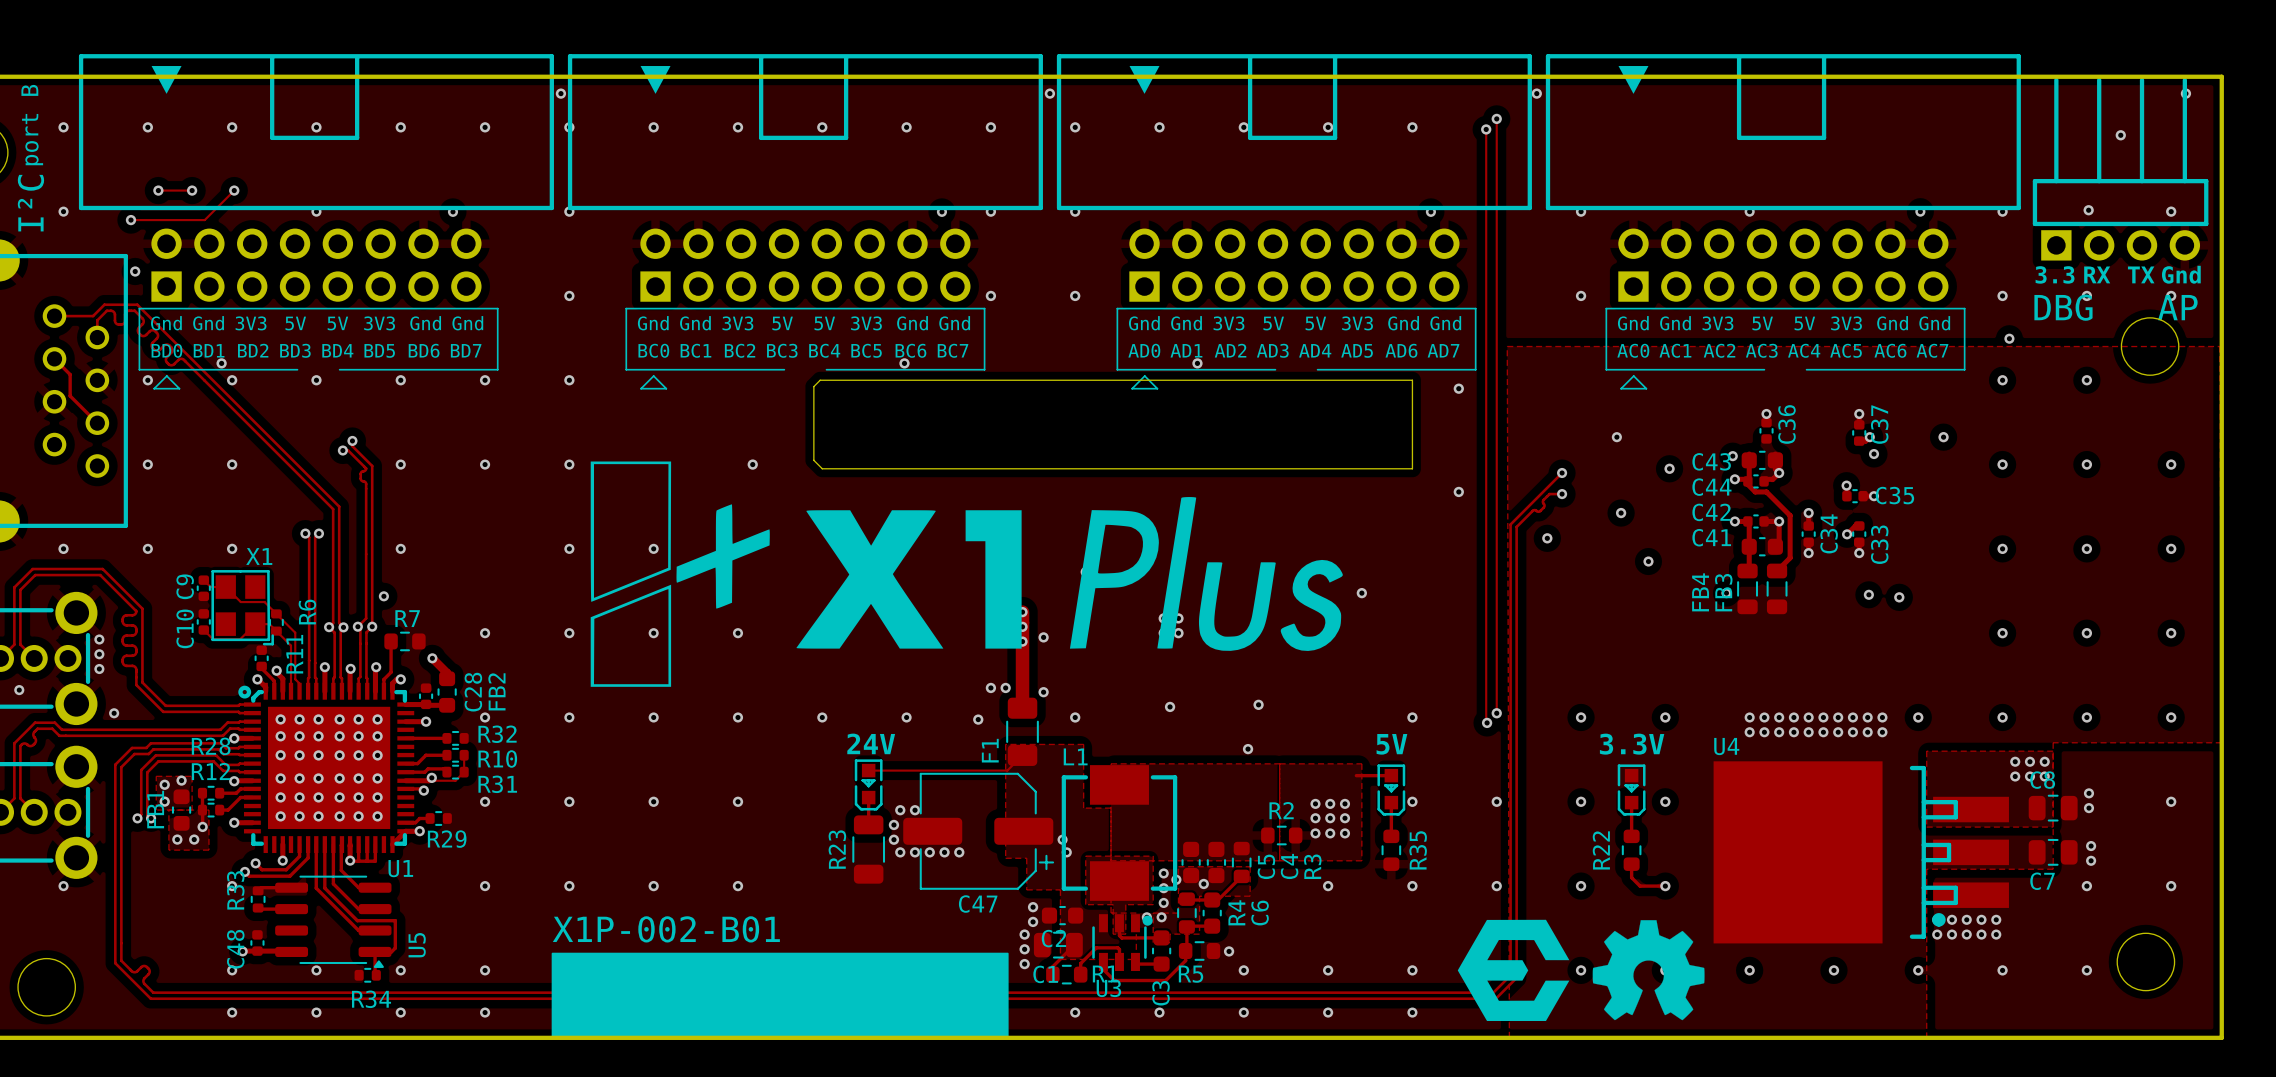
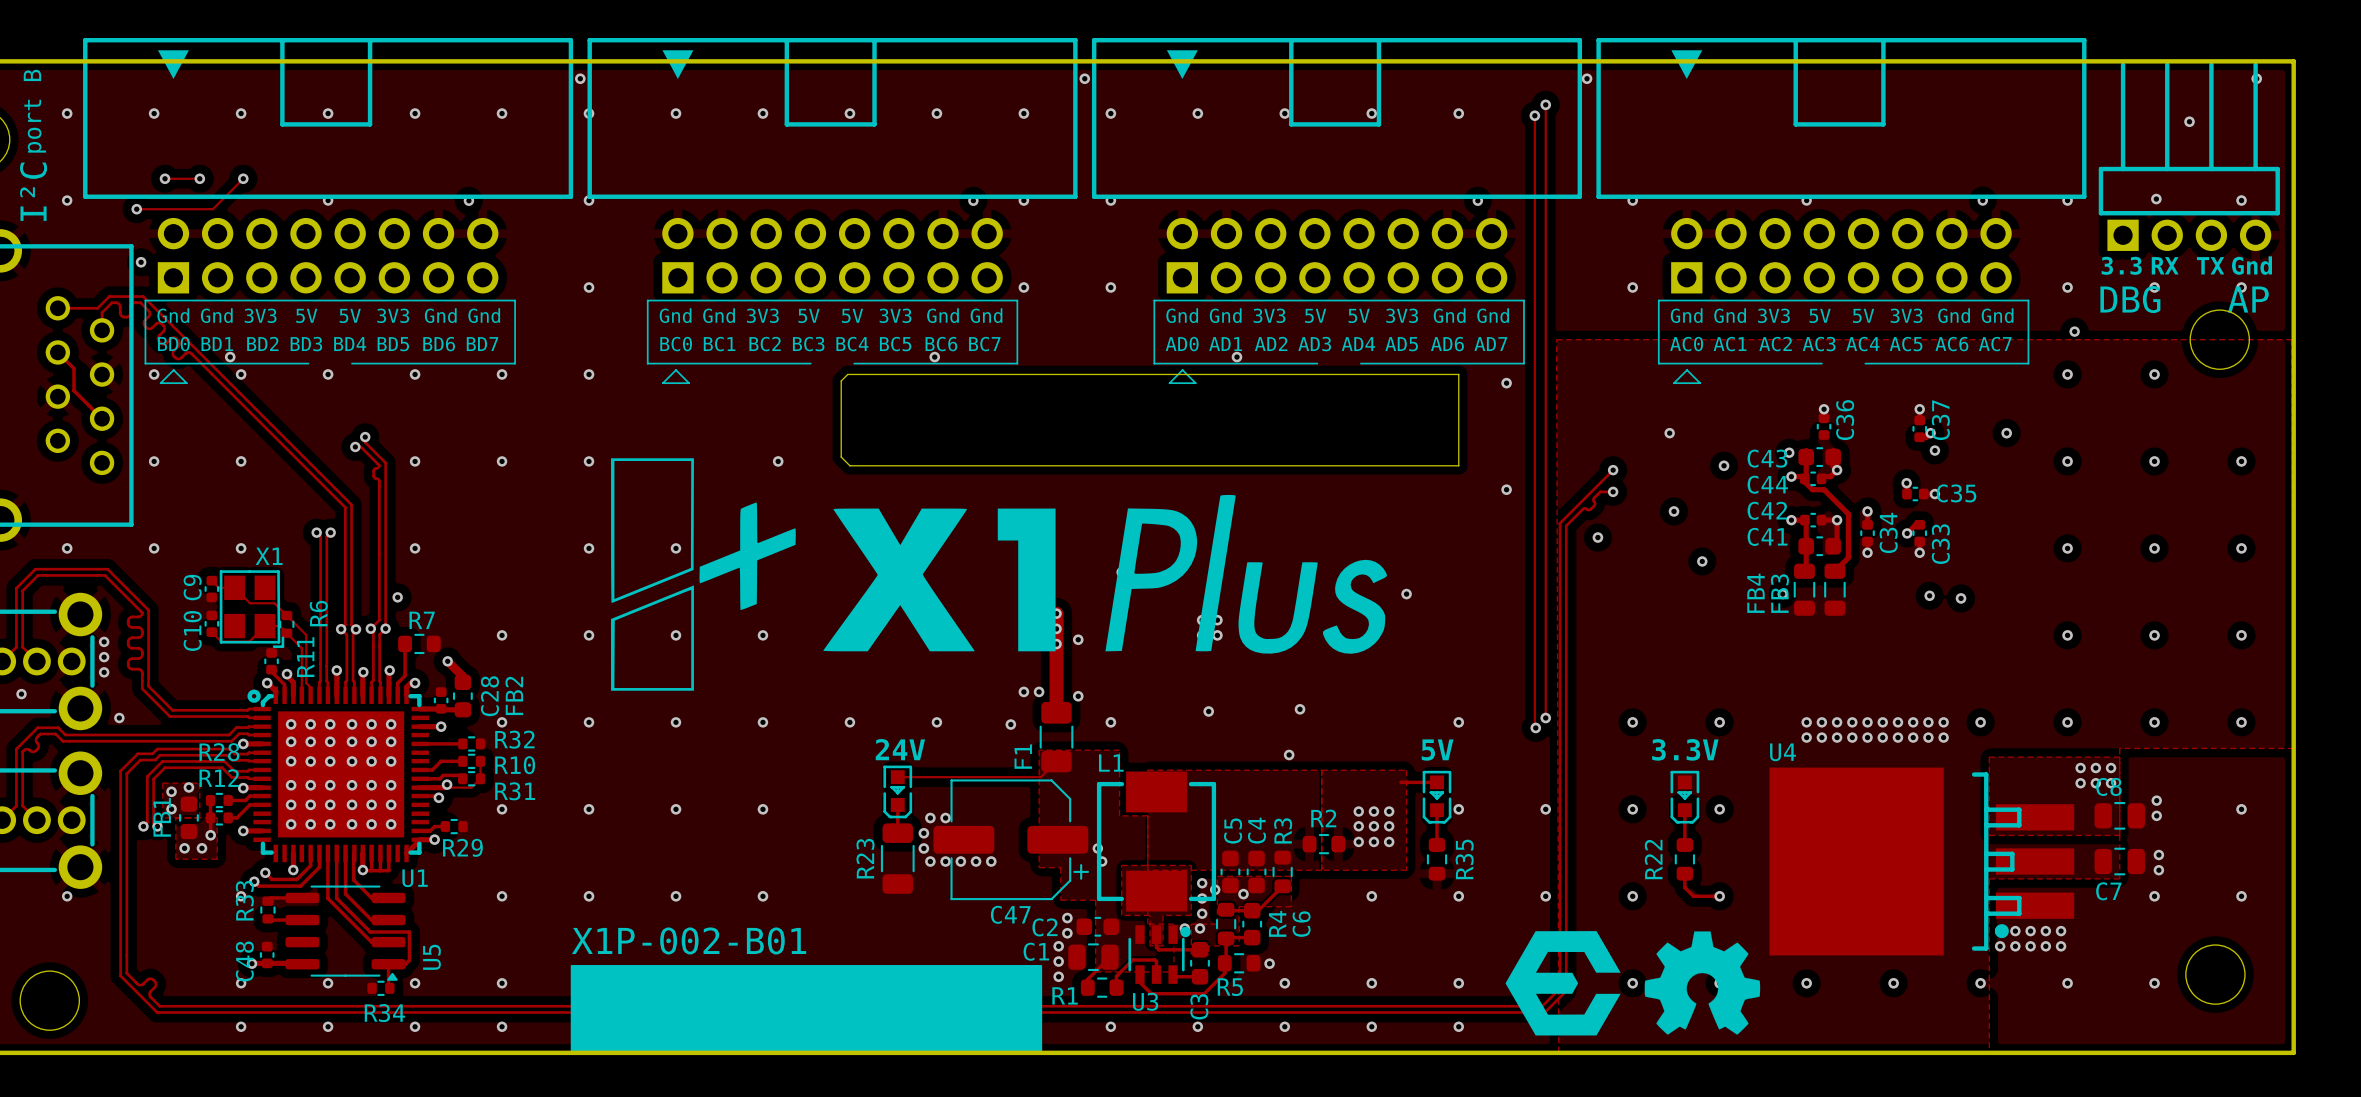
C5 name position: C5 (1266, 866) -> C5 (1233, 831)
C4 name position: C4 (1289, 866) -> C4 (1256, 830)
R3 name position: R3 (1312, 866) -> R3 (1283, 830)
C2 name position: C2 (1053, 938) -> C2 (1044, 927)
R1 name position: R1 (1105, 973) -> R1 (1065, 995)
C1 name position: C1 (1045, 974) -> C1 (1036, 951)

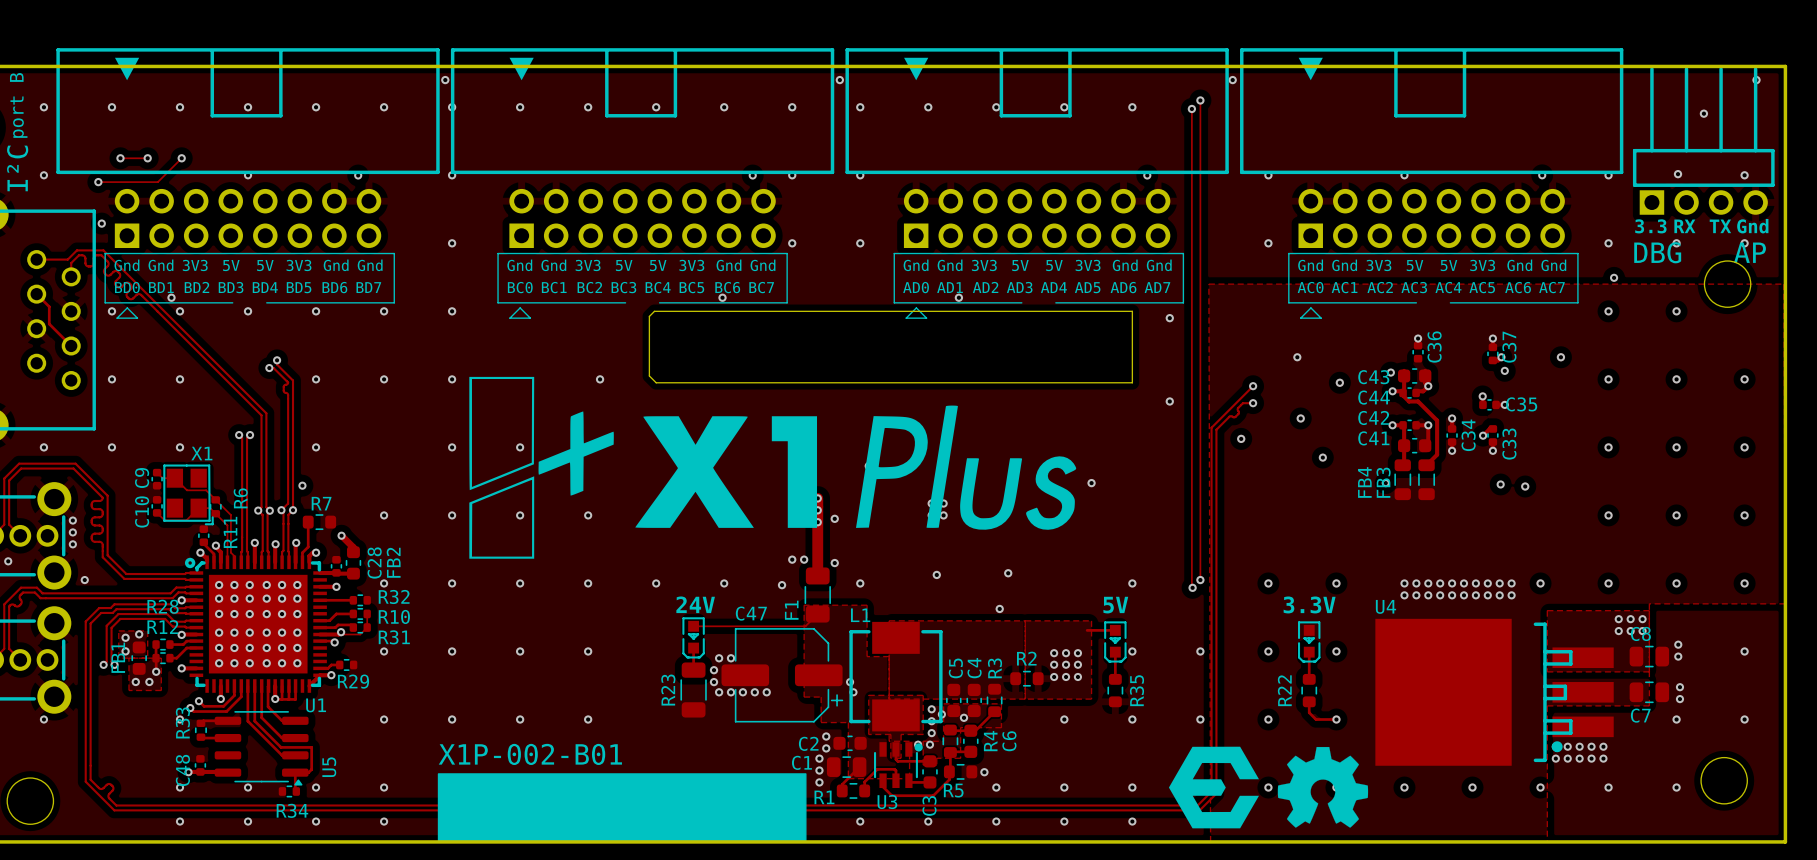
C47 name position: C47 (1010, 914) -> C47 (751, 613)

